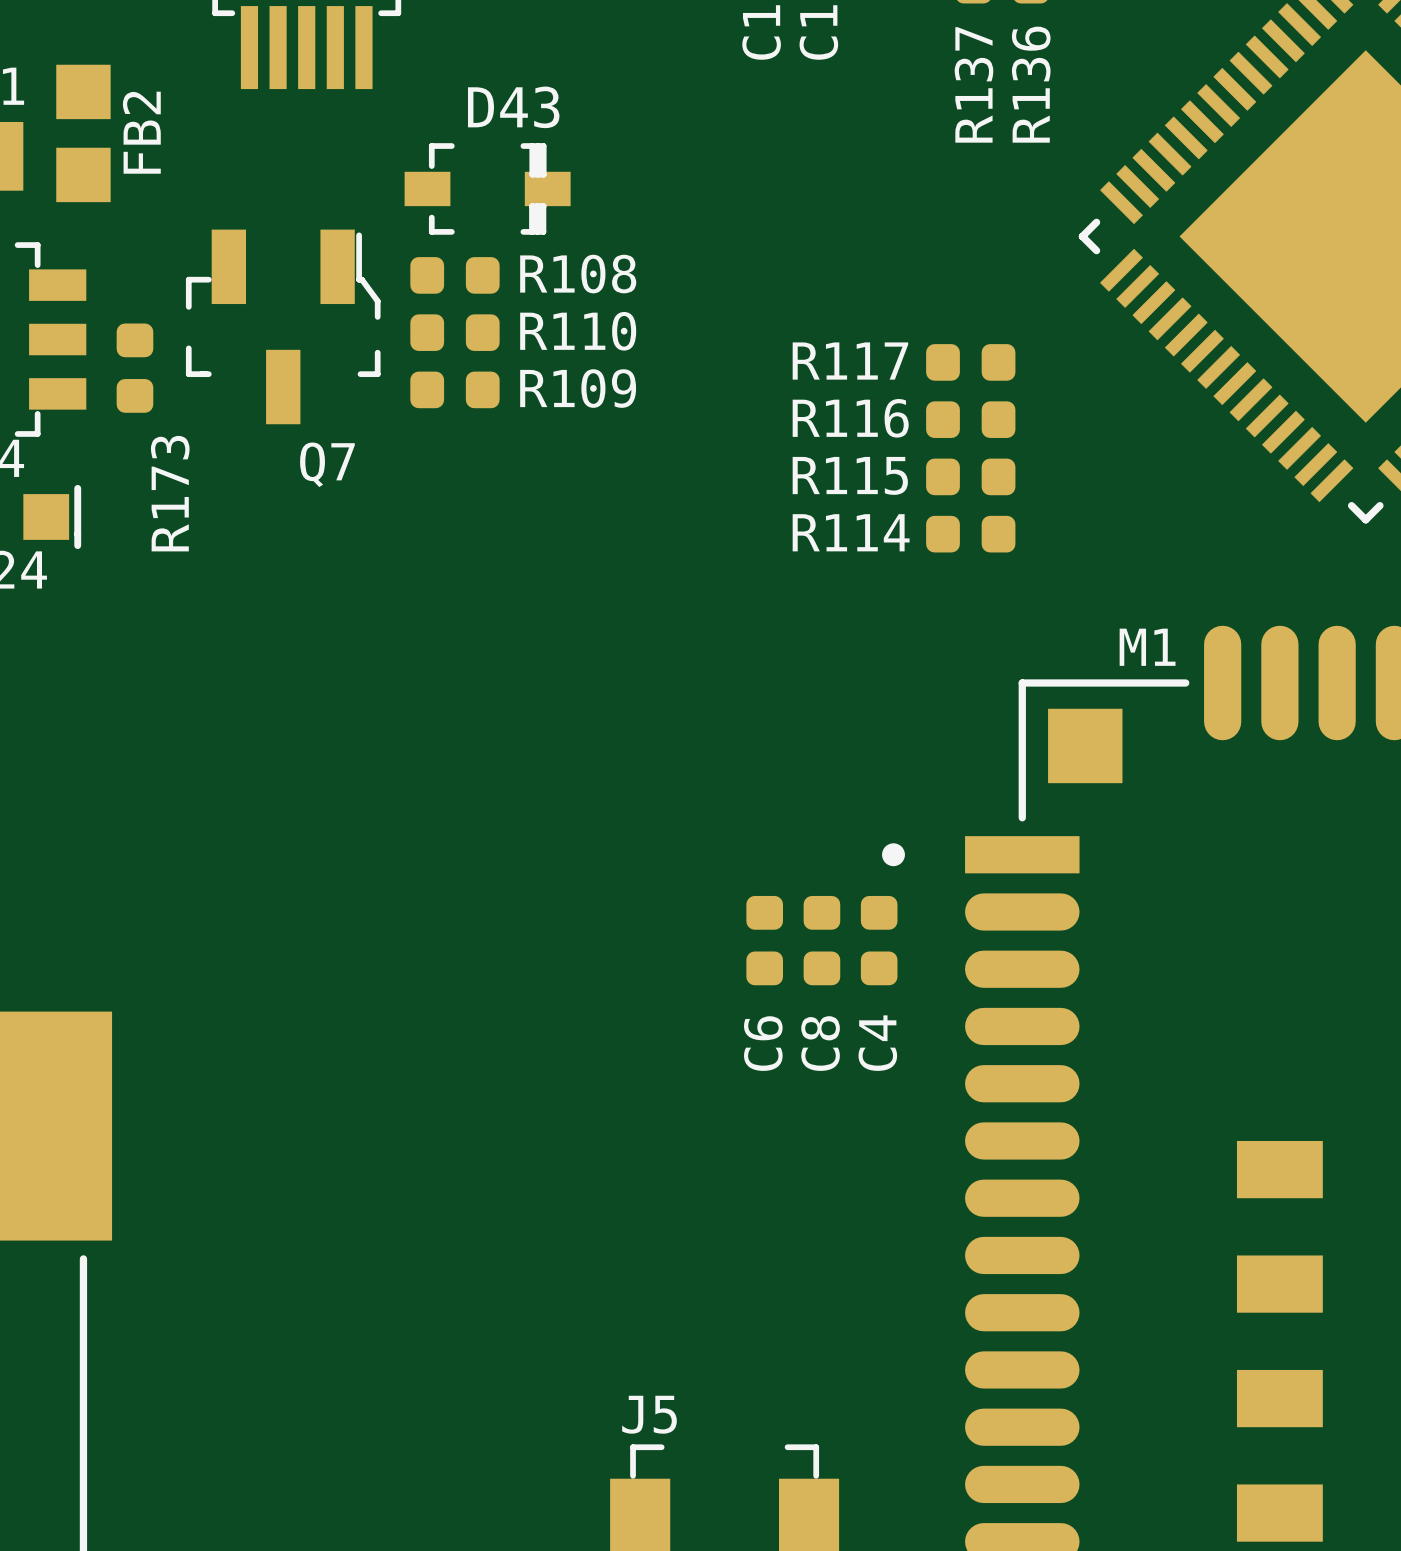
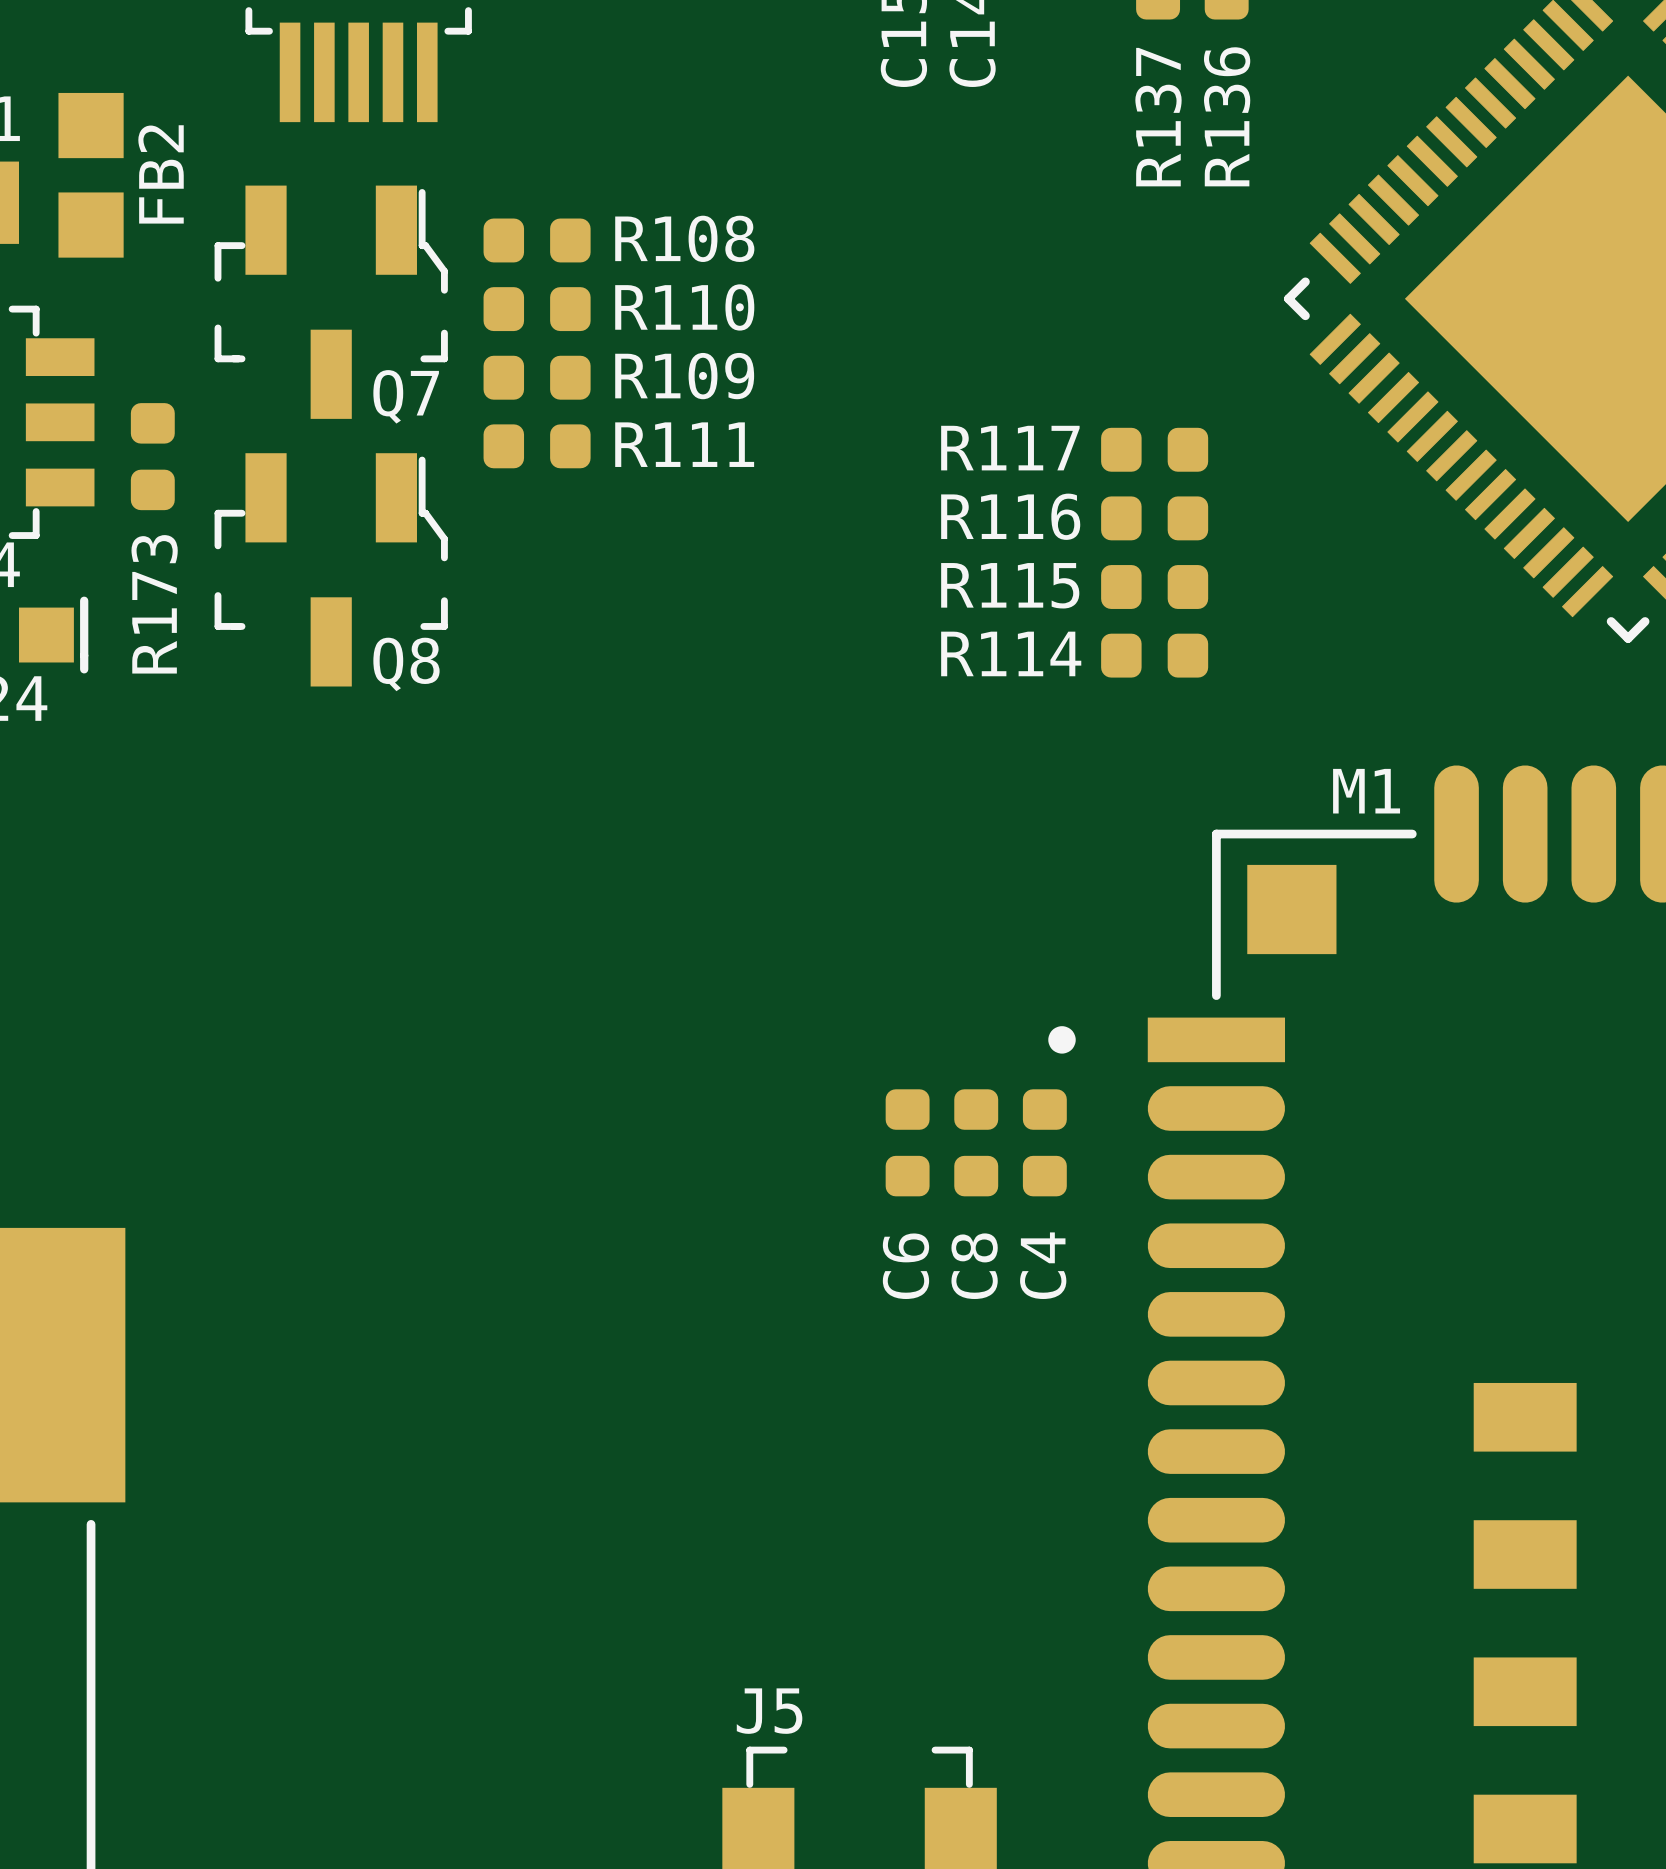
D43: (487, 188) -> none
R108 position: (454, 275) -> (537, 240)
Q7 position: (283, 326) -> (331, 302)
R110 position: (454, 332) -> (537, 309)
R111: none -> (537, 446)
R109 position: (454, 389) -> (537, 377)
Q8: none -> (331, 569)
Q7 name position: Q7 (327, 464) -> Q7 (406, 396)
R173 name position: R173 (170, 493) -> R173 (154, 604)

